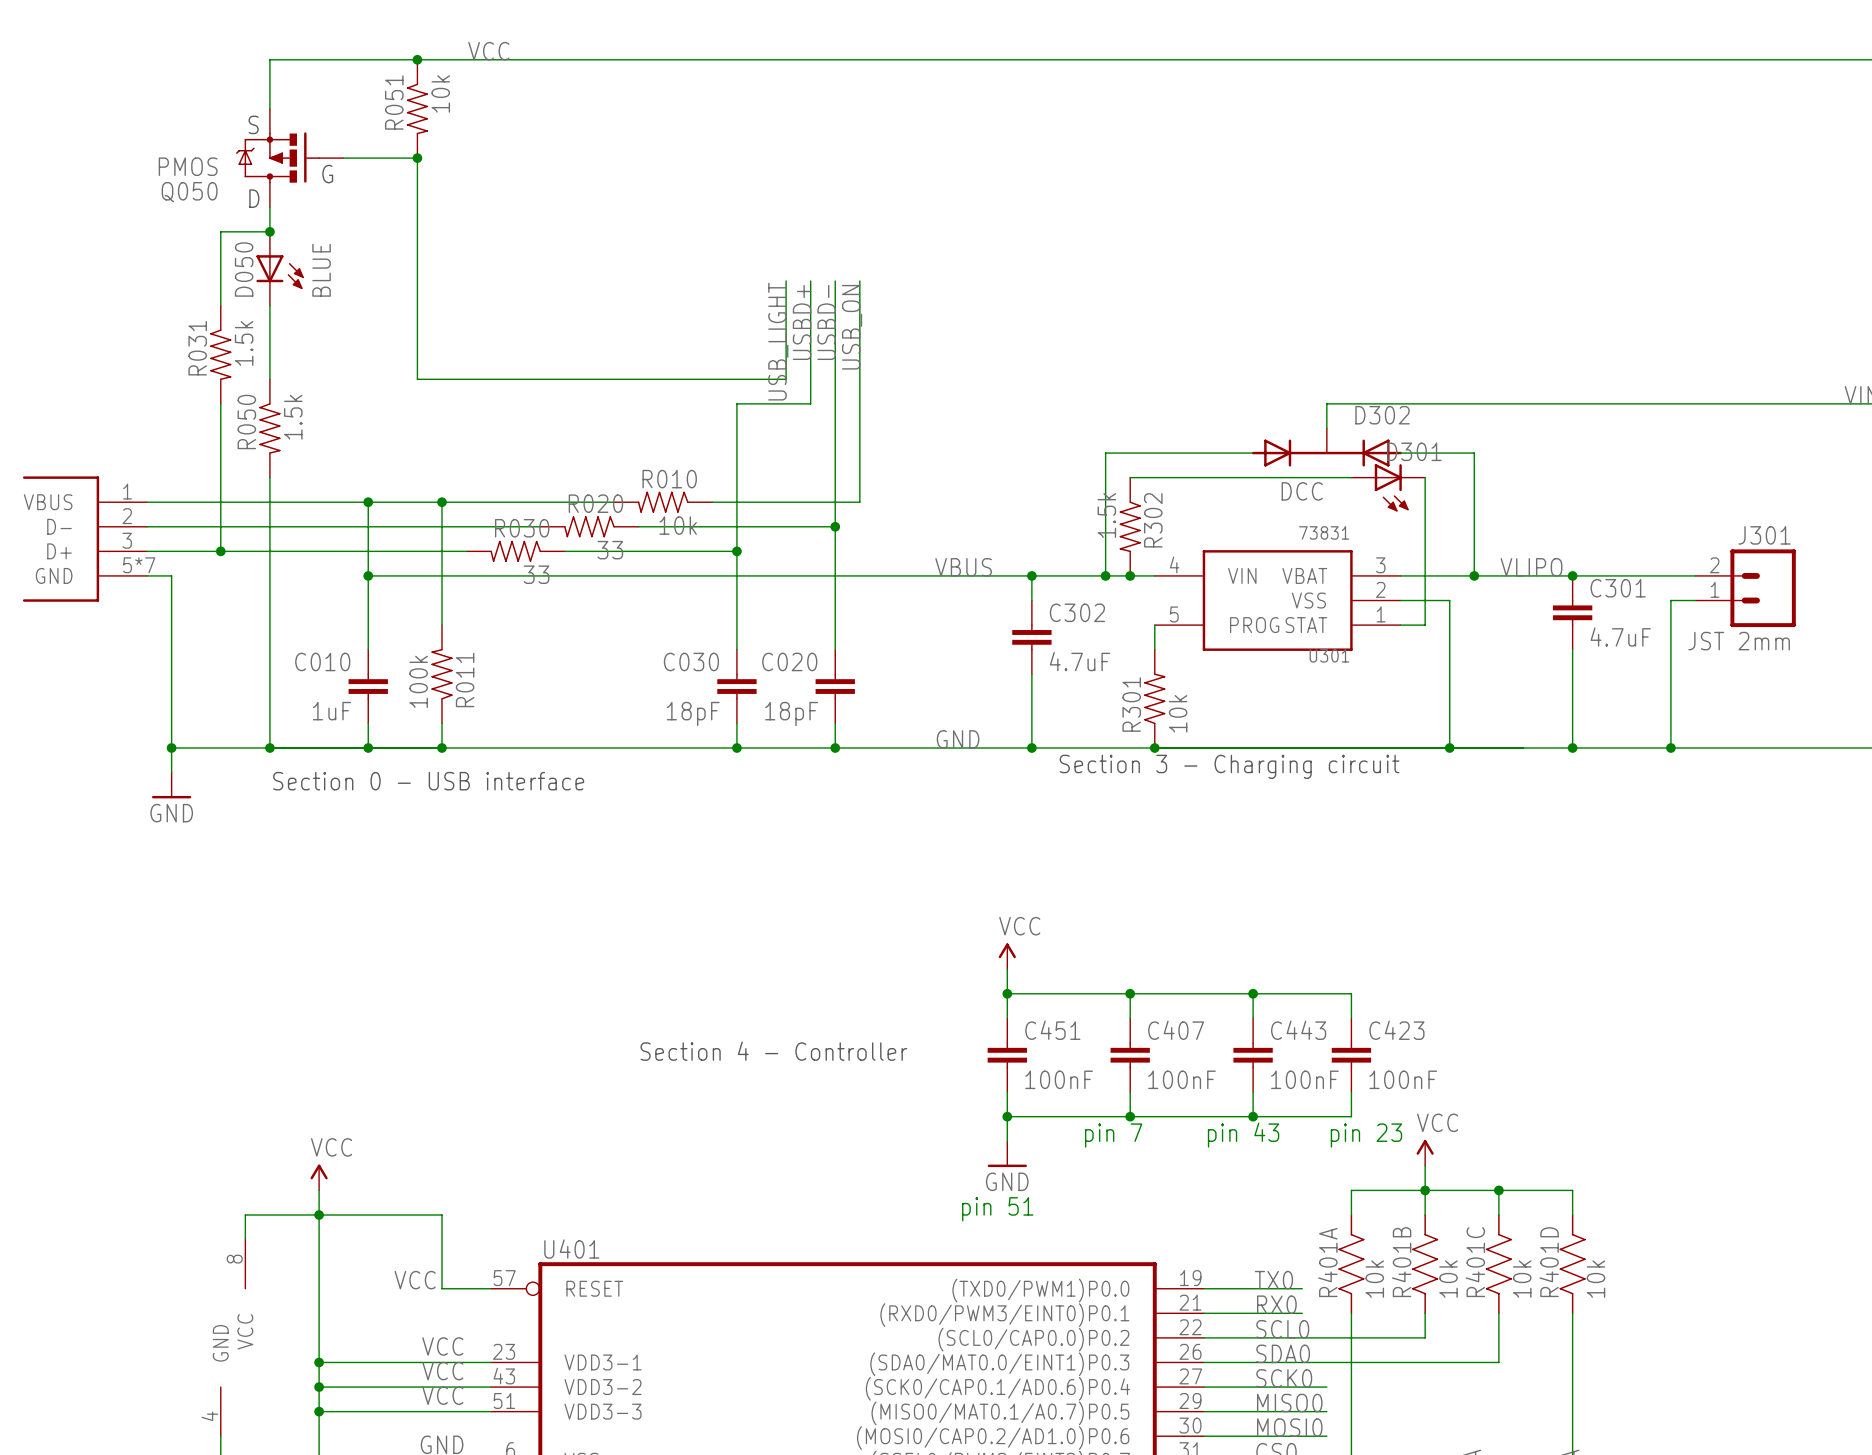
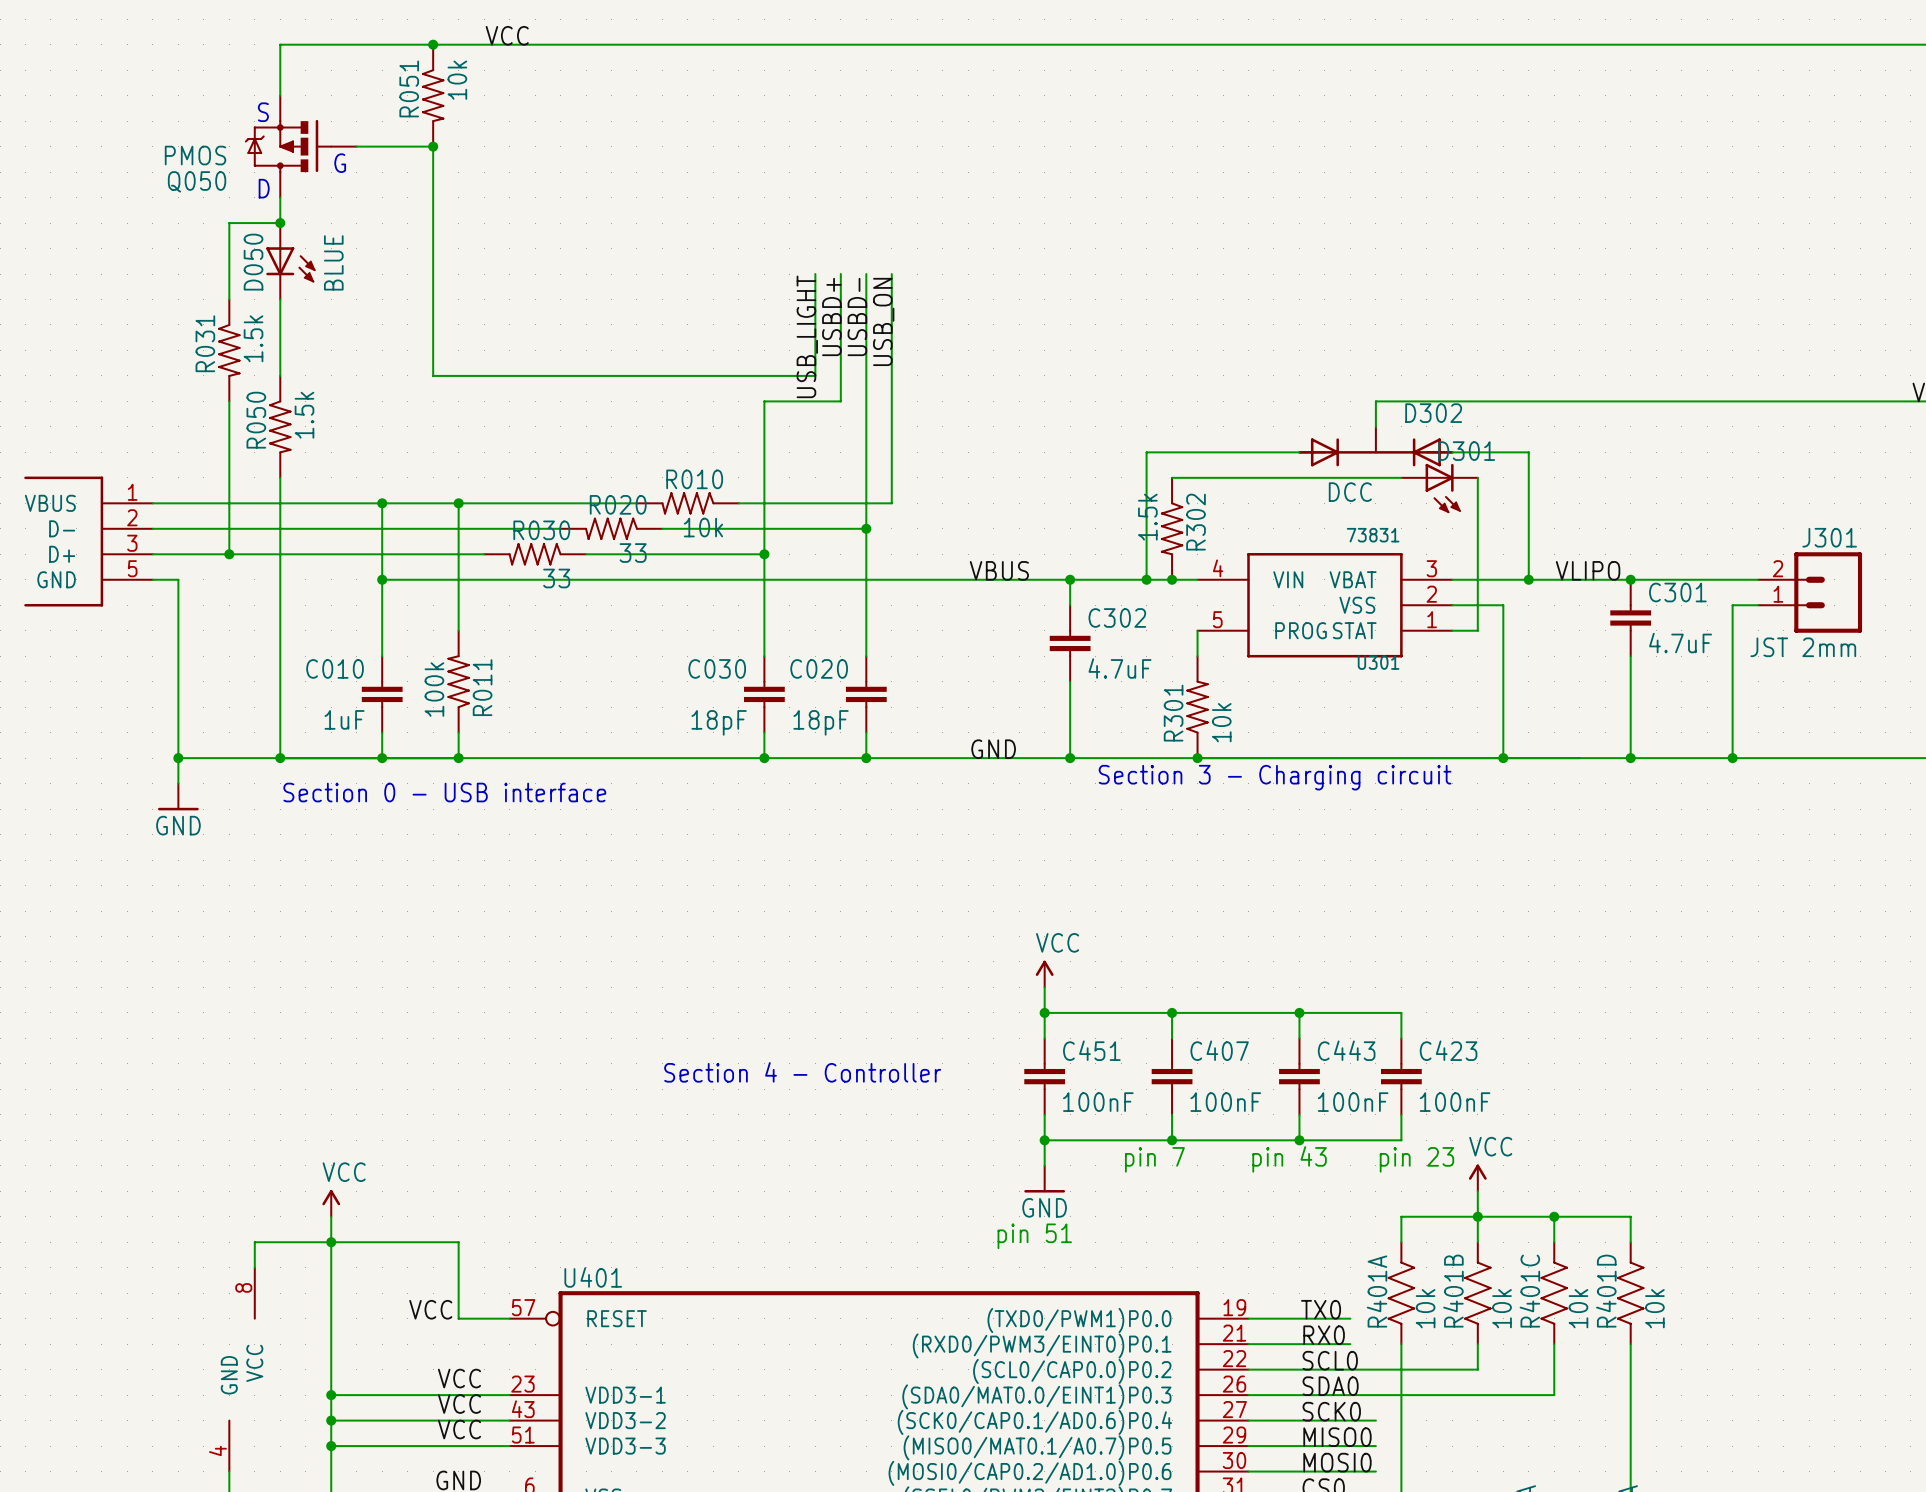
part pin number: 5*7 (139, 565) -> 5 (132, 568)

